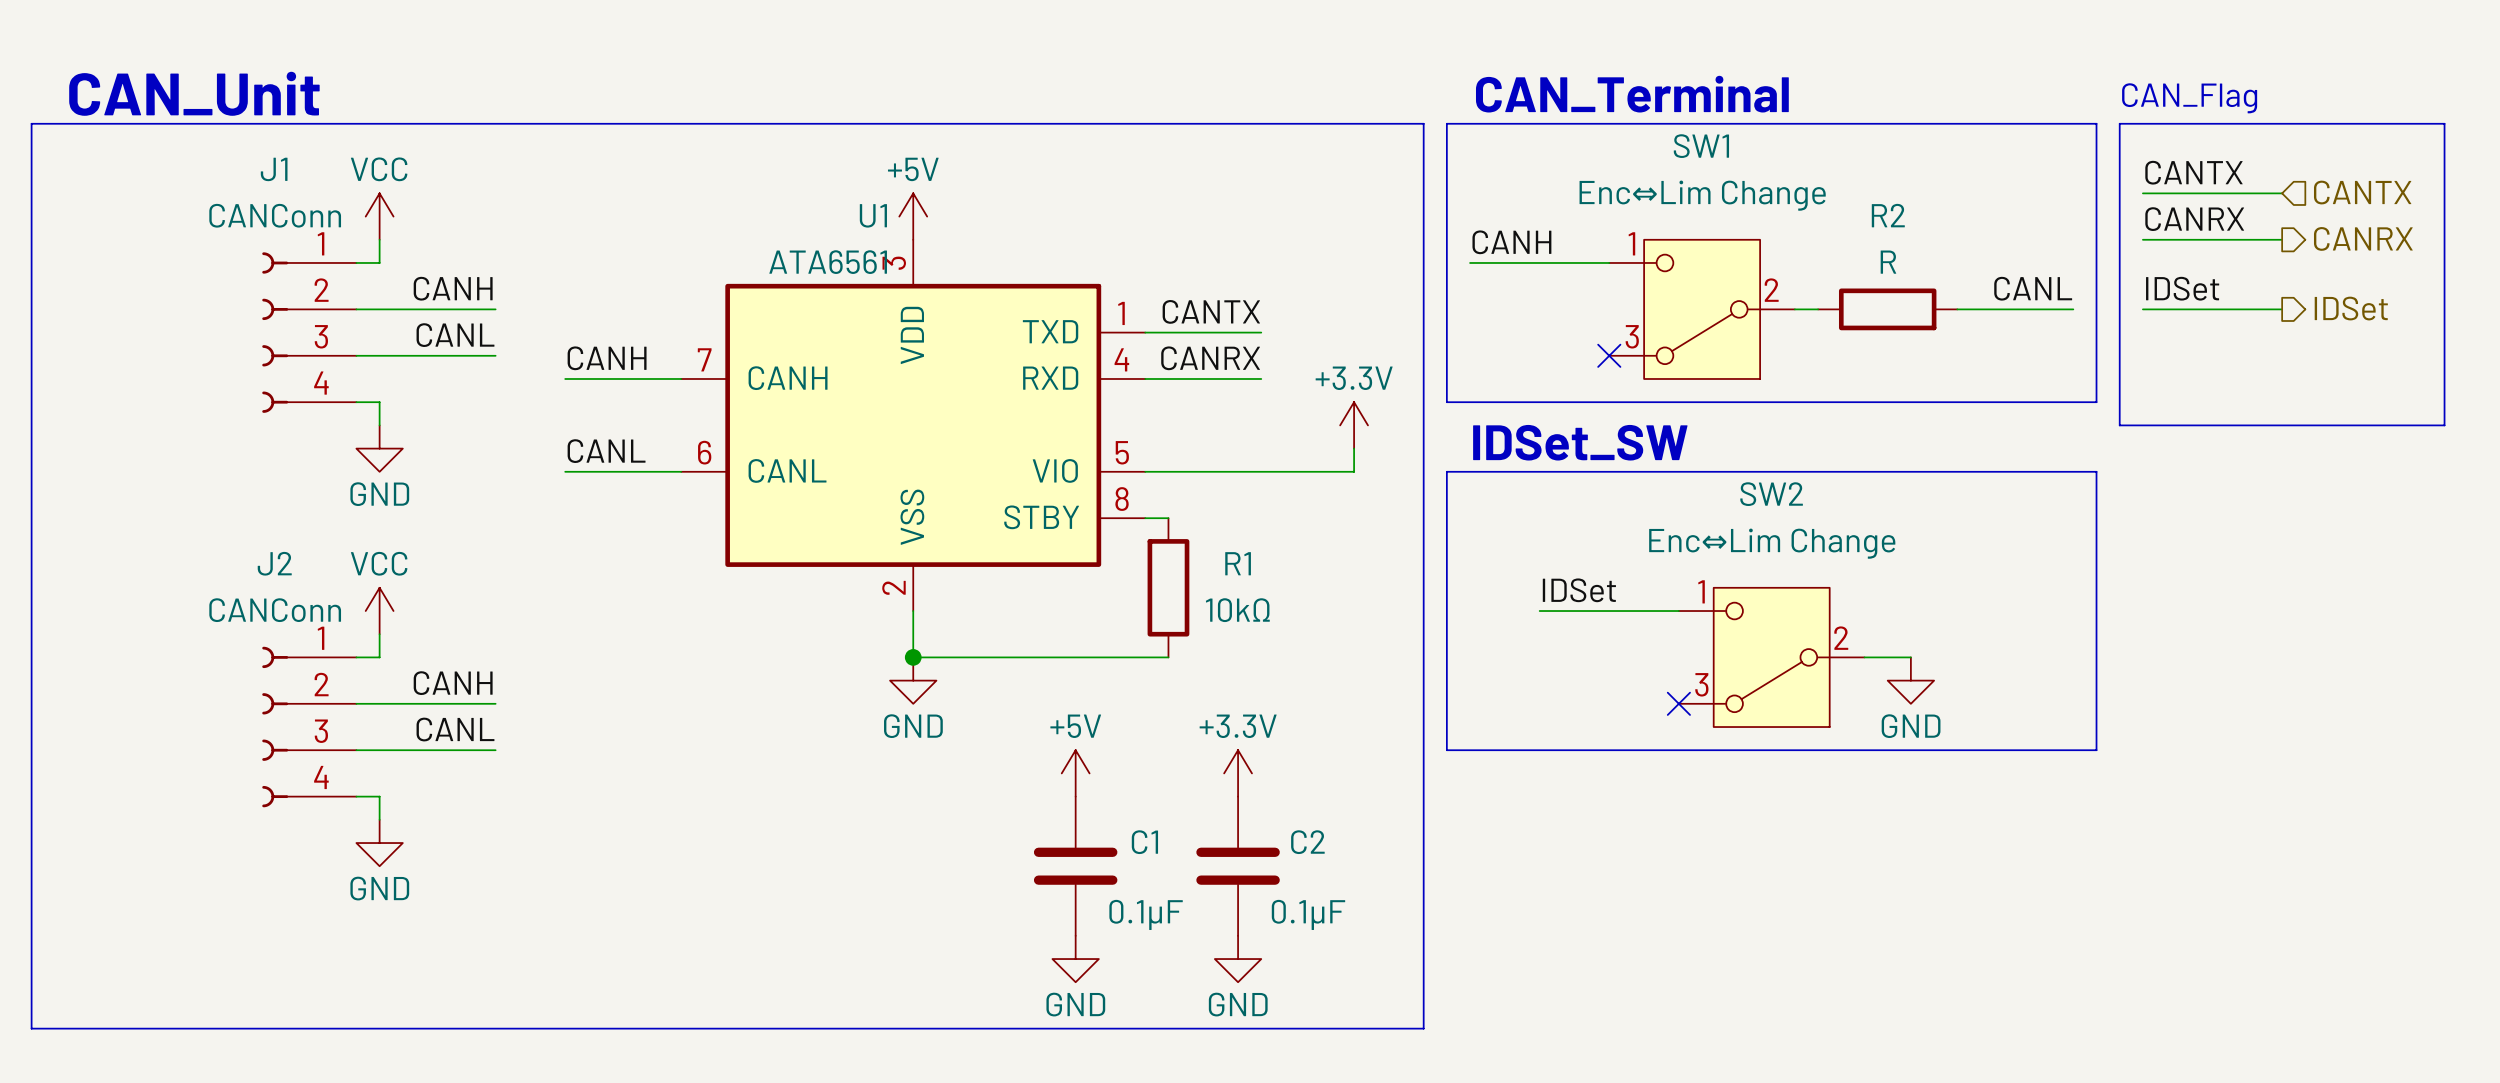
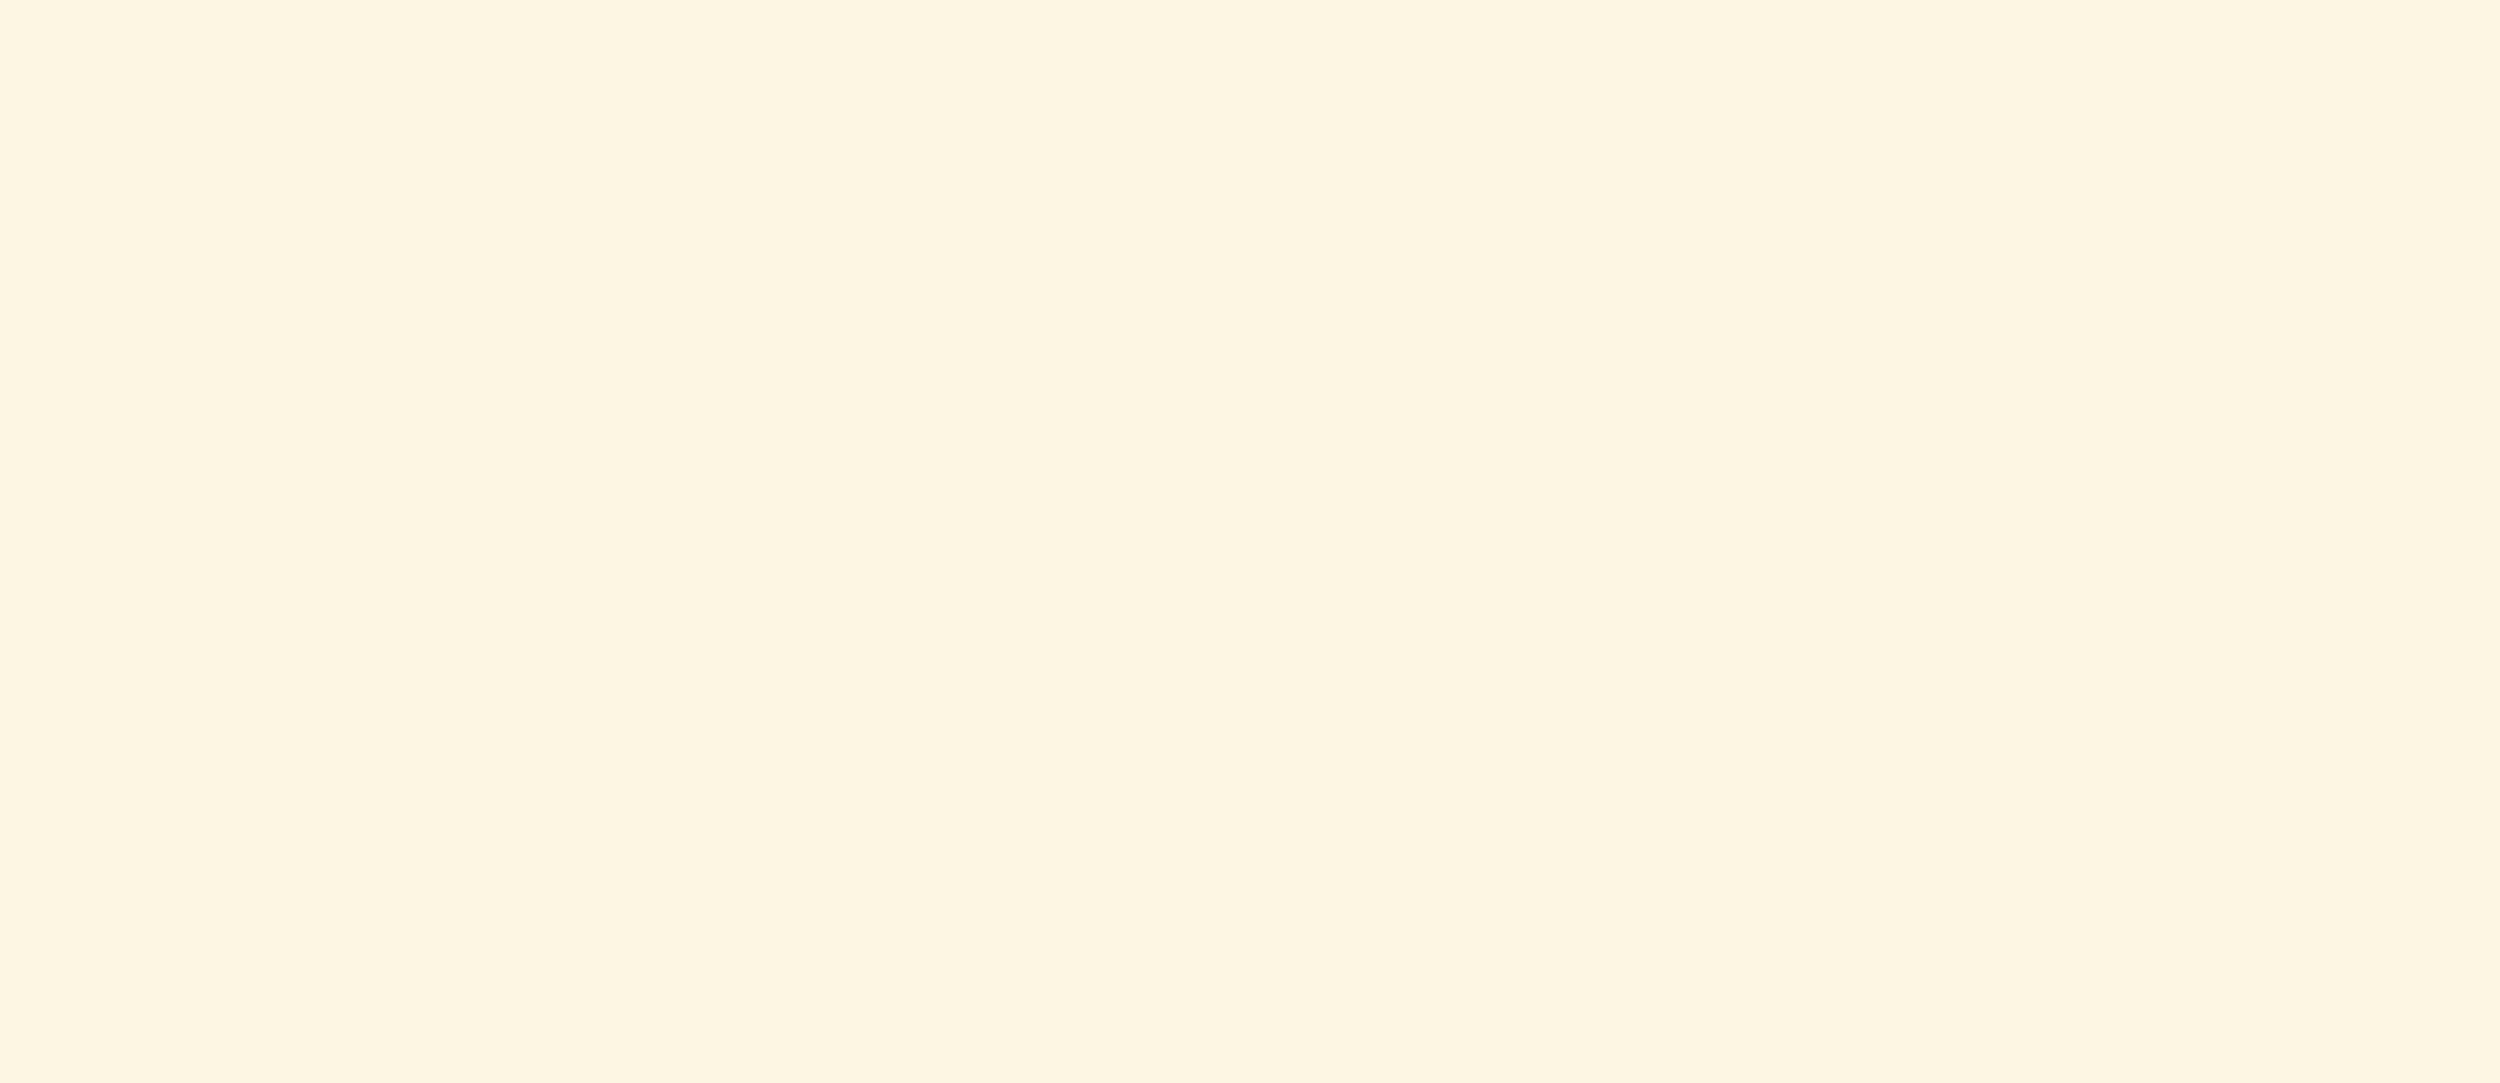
text: CAN_Unit (194, 93) -> none
text: CAN_Terminal (1632, 94) -> none
text: CAN_Flag (2189, 98) -> none
line: (31, 123) (1423, 123) (1423, 1028) (31, 1028) (31, 123) -> none
line: (1446, 123) (2096, 123) (2096, 402) (1446, 402) (1446, 123) -> none
line: (2119, 123) (2444, 123) (2444, 425) (2119, 425) (2119, 123) -> none
label: CANTX (2193, 172) -> none
hierarchical label: CANTX (2362, 192) -> none
wire: (2142, 193) (2282, 193) -> none
power symbol: VCC (379, 216) -> none
power symbol: +5V (913, 216) -> none
label: CANRX (2194, 219) -> none
hierarchical label: CANRX (2363, 238) -> none
wire: (379, 239) (379, 262) (356, 262) -> none
wire: (2142, 239) (2282, 239) -> none
label: CANH (1511, 242) -> none
wire: (1470, 262) (1609, 262) -> none
label: CANH (453, 288) -> none
label: CANL (2033, 288) -> none
label: IDSet (2182, 288) -> none
hierarchical label: IDSet (2351, 308) -> none
wire: (356, 309) (495, 309) -> none
SW1: Enc⇔Lim Change (1702, 309) -> none
wire: (1794, 309) (1818, 309) -> none
R2: R (1887, 309) -> none
wire: (1957, 309) (2073, 309) -> none
wire: (2142, 309) (2282, 309) -> none
label: CANTX (1211, 311) -> none
J1: CANConn (309, 332) -> none
wire: (1145, 332) (1261, 332) -> none
label: CANL (455, 335) -> none
wire: (356, 355) (495, 355) -> none
no-connect mark: (1609, 355) -> none
label: CANH (607, 358) -> none
label: CANRX (1210, 358) -> none
wire: (565, 378) (681, 378) -> none
wire: (1145, 378) (1261, 378) -> none
wire: (356, 402) (379, 402) (379, 425) -> none
U1: ATA6561 (913, 425) -> none
power symbol: +3.3V (1354, 425) -> none
text: IDSet_SW (1580, 442) -> none
power symbol: GND (379, 448) -> none
wire: (1354, 448) (1354, 471) (1145, 471) -> none
label: CANL (606, 451) -> none
wire: (565, 471) (681, 471) -> none
line: (1446, 471) (1446, 750) (2096, 750) (2096, 471) (1446, 471) -> none
wire: (1145, 518) (1168, 518) -> none
R1: 10kΩ (1168, 587) -> none
label: IDSet (1579, 590) -> none
power symbol: VCC (379, 611) -> none
wire: (913, 611) (913, 657) (1168, 657) -> none
wire: (1539, 611) (1678, 611) -> none
wire: (379, 634) (379, 657) (356, 657) -> none
junction: (913, 657) -> none
SW2: Enc⇔Lim Change (1771, 657) -> none
wire: (1864, 657) (1910, 657) -> none
power symbol: GND (913, 680) -> none
power symbol: GND (1910, 680) -> none
label: CANH (453, 683) -> none
wire: (356, 703) (495, 703) -> none
no-connect mark: (1678, 703) -> none
J2: CANConn (309, 727) -> none
label: CANL (455, 729) -> none
wire: (356, 750) (495, 750) -> none
power symbol: +5V (1075, 773) -> none
power symbol: +3.3V (1238, 773) -> none
wire: (356, 796) (379, 796) (379, 819) -> none
power symbol: GND (379, 843) -> none
C1: 0.1μF (1075, 866) -> none
C2: 0.1μF (1238, 866) -> none
power symbol: GND (1075, 959) -> none
power symbol: GND (1238, 959) -> none

